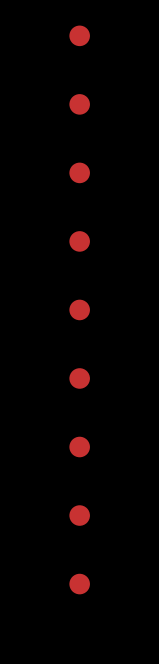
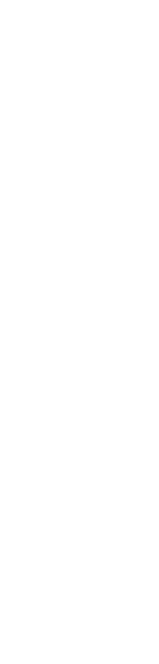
part: (79, 35) -> none
part: (79, 104) -> none
part: (79, 172) -> none
part: (79, 241) -> none
part: (79, 309) -> none
part: (79, 378) -> none
part: (79, 447) -> none
part: (79, 515) -> none
part: (79, 584) -> none

